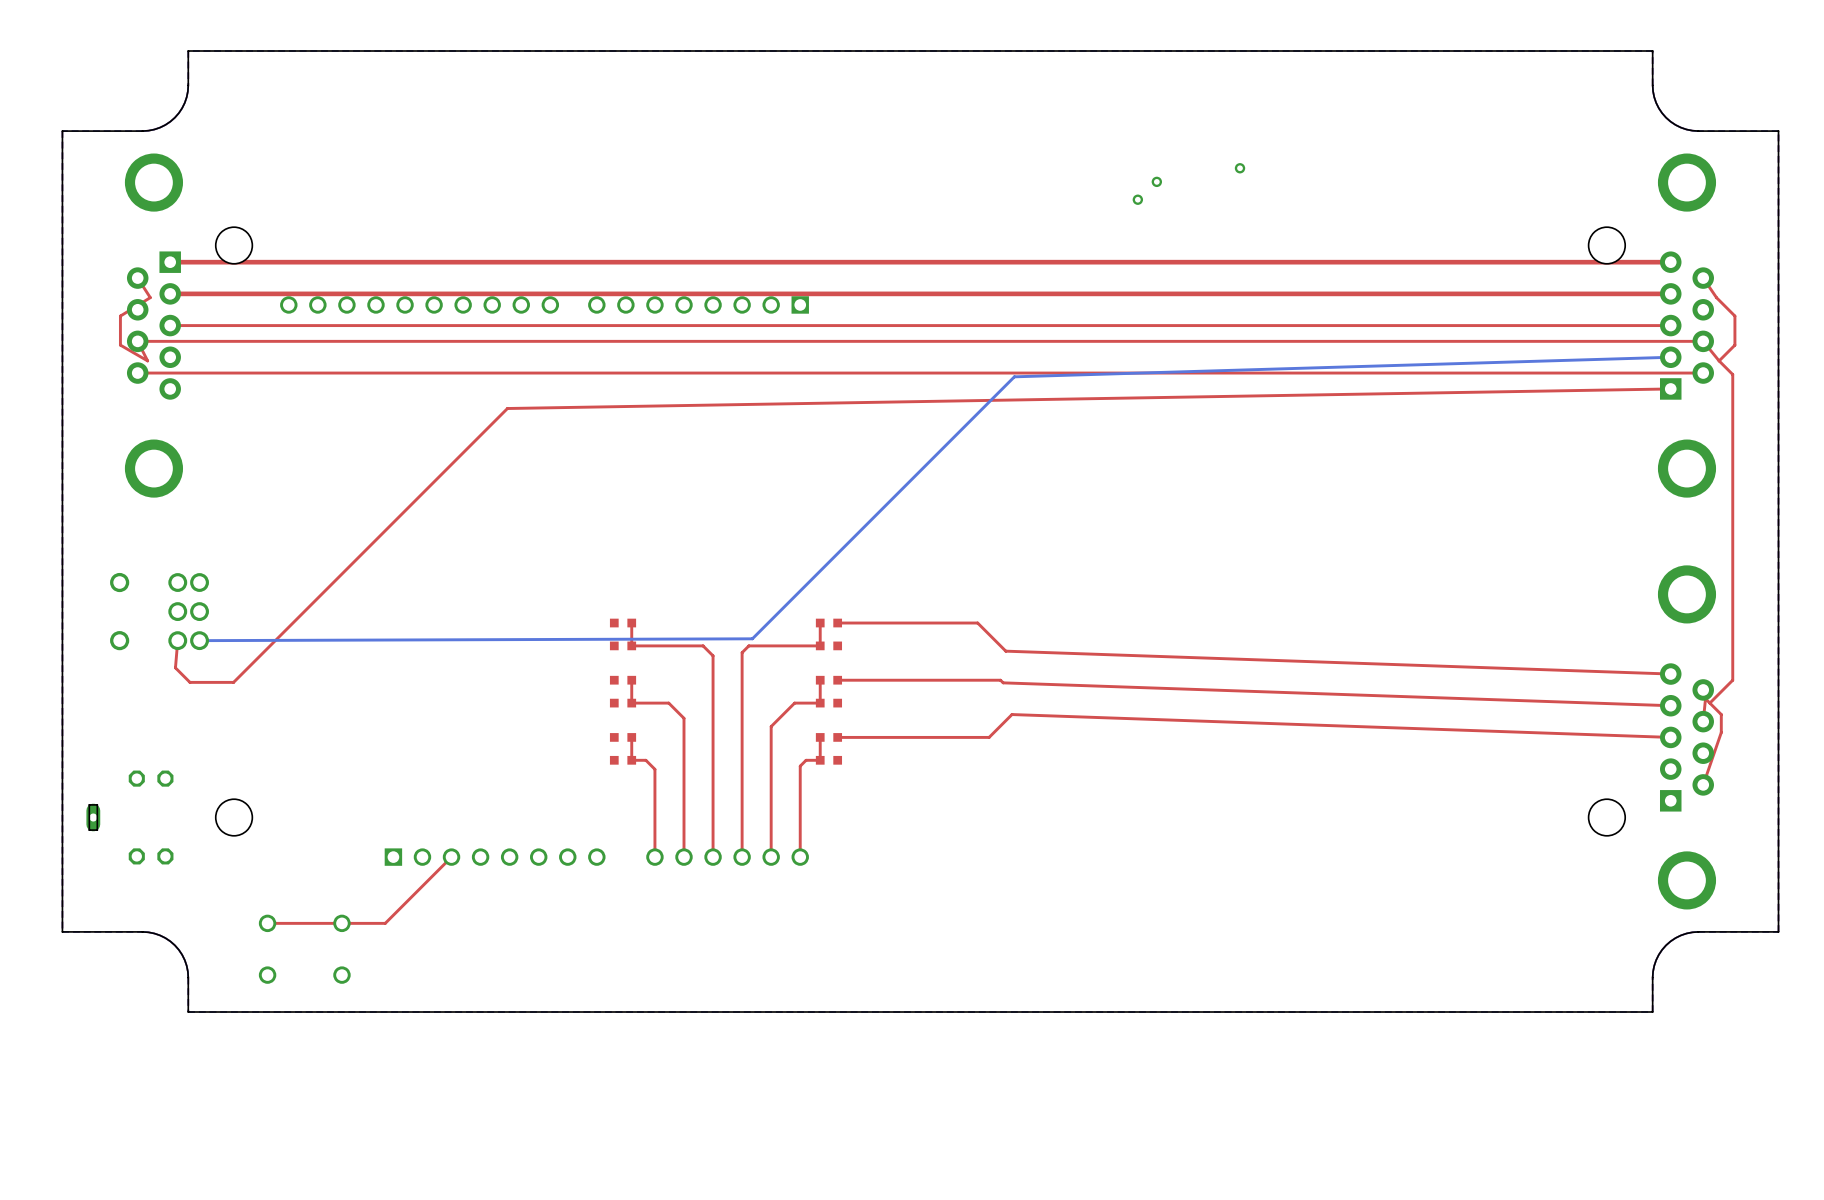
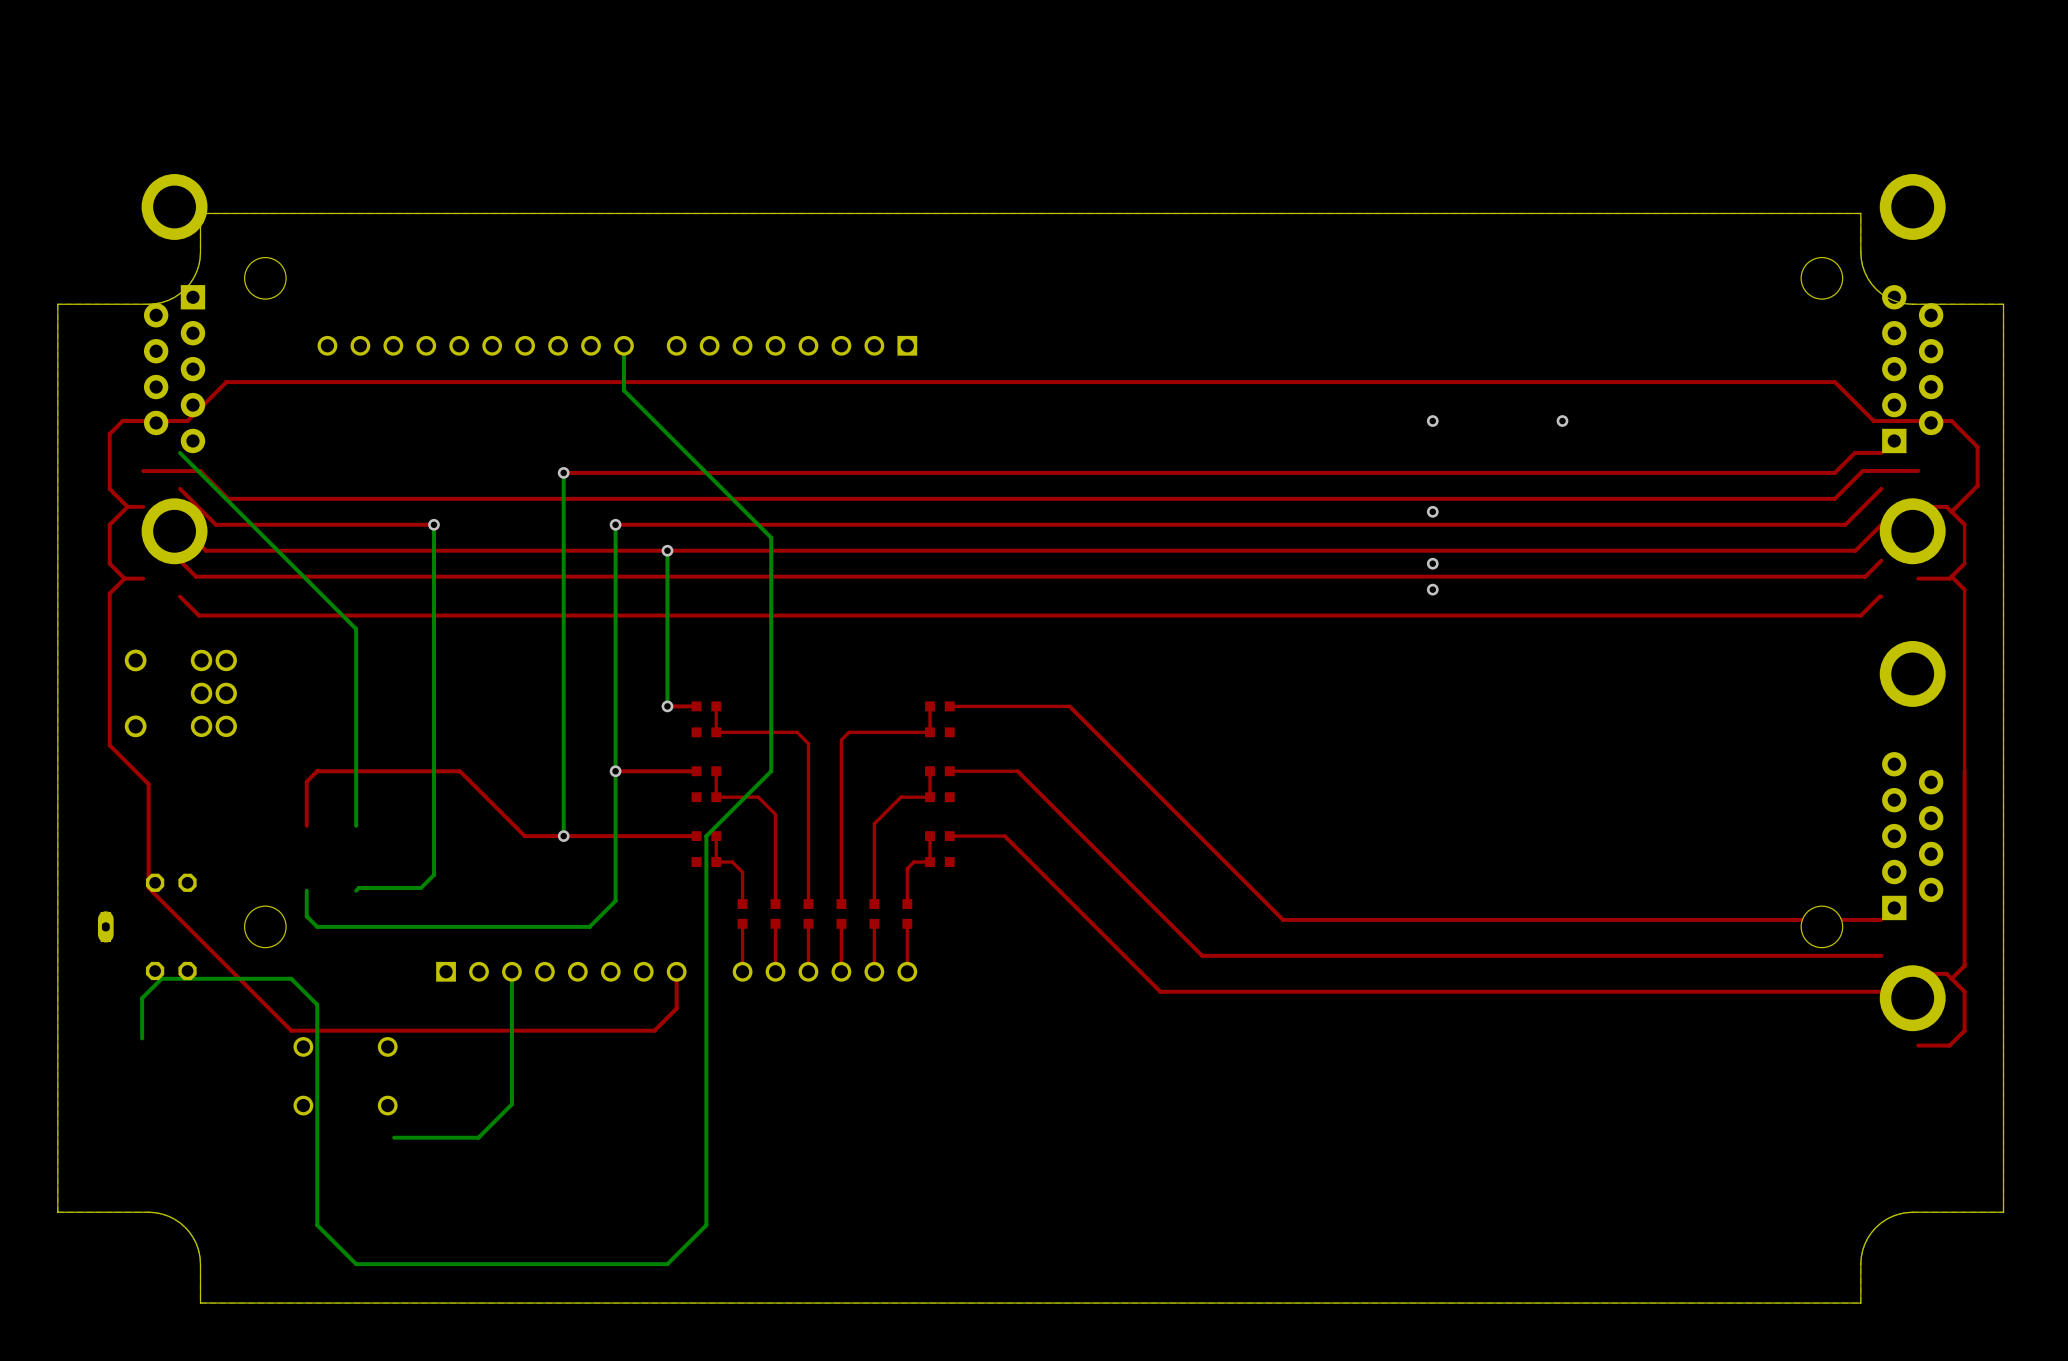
board edge: (1652, 50) (188, 50) (186, 97) (178, 113) (165, 124) (154, 129) (142, 131) (62, 131) (62, 931) (142, 931) (154, 933) (165, 938) (178, 949) (186, 965) (188, 1012) (1652, 1012) (1654, 965) (1662, 949) (1675, 938) (1686, 933) (1698, 931) (1778, 931) (1778, 131) (1698, 131) (1686, 129) (1675, 124) (1662, 113) (1654, 97) (1652, 50) -> (1860, 213) (200, 213) (198, 265) (189, 283) (174, 297) (162, 302) (148, 304) (57, 304) (57, 1212) (148, 1212) (162, 1214) (174, 1219) (189, 1232) (198, 1250) (200, 1303) (1860, 1303) (1862, 1250) (1871, 1232) (1886, 1219) (1899, 1214) (1912, 1212) (2003, 1212) (2003, 304) (1912, 304) (1899, 302) (1886, 297) (1871, 283) (1862, 265) (1860, 213)
via: (1240, 168) -> none
via: (1156, 181) -> none
via: (1137, 199) -> none
top track: (1670, 262) (170, 262) -> none
top track: (137, 278) (150, 297) (120, 316) (120, 345) (147, 360) (137, 341) (1703, 341) (1719, 360) -> none
top track: (1703, 278) (1716, 297) (1734, 316) (1734, 345) (1719, 360) -> none
top track: (1670, 293) (170, 293) -> none
bottom track: none -> (623, 345) (623, 390) (771, 537) (771, 771) (706, 836) (706, 1225) (667, 1264) (356, 1264) (317, 1225) (317, 1004) (291, 978) (161, 978) (142, 998) (142, 1038)
top track: (1670, 325) (170, 325) -> none
bottom track: (1670, 357) (1014, 376) (752, 638) (199, 640) -> none
top track: (1719, 360) (1732, 374) (1732, 462) -> (1918, 506) (1946, 506) (1964, 524)
via: none -> (1432, 421)
via: none -> (1562, 421)
top track: (1703, 373) (137, 373) -> none
top track: (1670, 388) (507, 408) (233, 682) (189, 682) (175, 667) (177, 640) -> none
bottom track: none -> (180, 452) (356, 629) (356, 825)
top track: none -> (1881, 452) (1854, 452) (1834, 472) (563, 472)
top track: none -> (1918, 470) (1862, 470) (1834, 498) (228, 498) (200, 471) (143, 471)
bottom track: none -> (563, 472) (563, 836)
via: none -> (563, 472)
top track: none -> (180, 488) (215, 524) (433, 524)
top track: none -> (1881, 488) (1845, 524) (615, 524)
top track: none -> (127, 506) (109, 524) (109, 563) (124, 578)
top track: none -> (127, 506) (109, 488) (109, 433) (122, 421) (187, 421) (226, 382) (1834, 382) (1873, 421) (1951, 421) (1977, 446) (1977, 485) (1951, 511)
top track: none -> (143, 506) (127, 506)
via: none -> (1432, 511)
bottom track: none -> (433, 524) (433, 875) (421, 887) (358, 887) (356, 890)
via: none -> (433, 524)
bottom track: none -> (615, 524) (615, 900) (589, 926) (317, 926) (306, 916) (306, 890)
via: none -> (615, 524)
top track: none -> (1881, 524) (1855, 550) (205, 550) (180, 524)
bottom track: none -> (667, 550) (667, 706)
via: none -> (667, 550)
top track: none -> (1881, 560) (1865, 576) (195, 576) (180, 560)
via: none -> (1432, 563)
top track: (1732, 497) (1732, 520) -> (1951, 576) (1964, 589)
top track: none -> (1964, 563) (1949, 578) (1918, 578)
top track: none -> (124, 578) (109, 593) (109, 745) (148, 784) (148, 887) (291, 1030) (654, 1030) (676, 1008) (676, 971)
top track: none -> (143, 578) (124, 578)
via: none -> (1432, 589)
top track: none -> (1881, 596) (1860, 615) (198, 615) (180, 596)
via: none -> (667, 706)
top track: none -> (696, 706) (667, 706)
top track: (943, 623) (977, 623) (1005, 651) (1670, 674) -> none
via: none -> (615, 771)
top track: none -> (696, 771) (615, 771)
top track: none -> (1017, 771) (1202, 955) (1881, 955)
top track: (1000, 680) (897, 680) -> (1134, 771) (1069, 706)
top track: (1732, 680) (1709, 703) -> (1964, 771) (1964, 965) (1951, 978)
top track: (1003, 682) (1670, 705) -> (1137, 774) (1283, 919) (1881, 919)
top track: (1703, 721) (1705, 698) (1721, 714) (1721, 732) (1703, 784) -> none
top track: none -> (306, 825) (306, 781) (317, 771) (459, 771) (524, 836) (696, 836)
via: none -> (563, 836)
top track: (1670, 737) (1012, 714) (989, 737) (886, 737) -> (1881, 991) (1160, 991) (1004, 836)
top track: (654, 797) (654, 814) -> none
top track: (684, 797) (684, 814) -> none
top track: (713, 797) (713, 814) -> none
top track: (742, 797) (742, 814) -> none
top track: (771, 797) (771, 814) -> none
top track: (800, 797) (800, 814) -> none
part: none -> (742, 913)
part: none -> (775, 913)
part: none -> (808, 913)
part: none -> (841, 913)
part: none -> (874, 913)
part: none -> (907, 913)
top track: (451, 857) (385, 923) (267, 923) -> none
bottom track: none -> (511, 971) (511, 1104) (478, 1137) (394, 1137)
top track: none -> (1918, 973) (1946, 973) (1964, 991) (1964, 1030) (1949, 1045) (1918, 1045)

